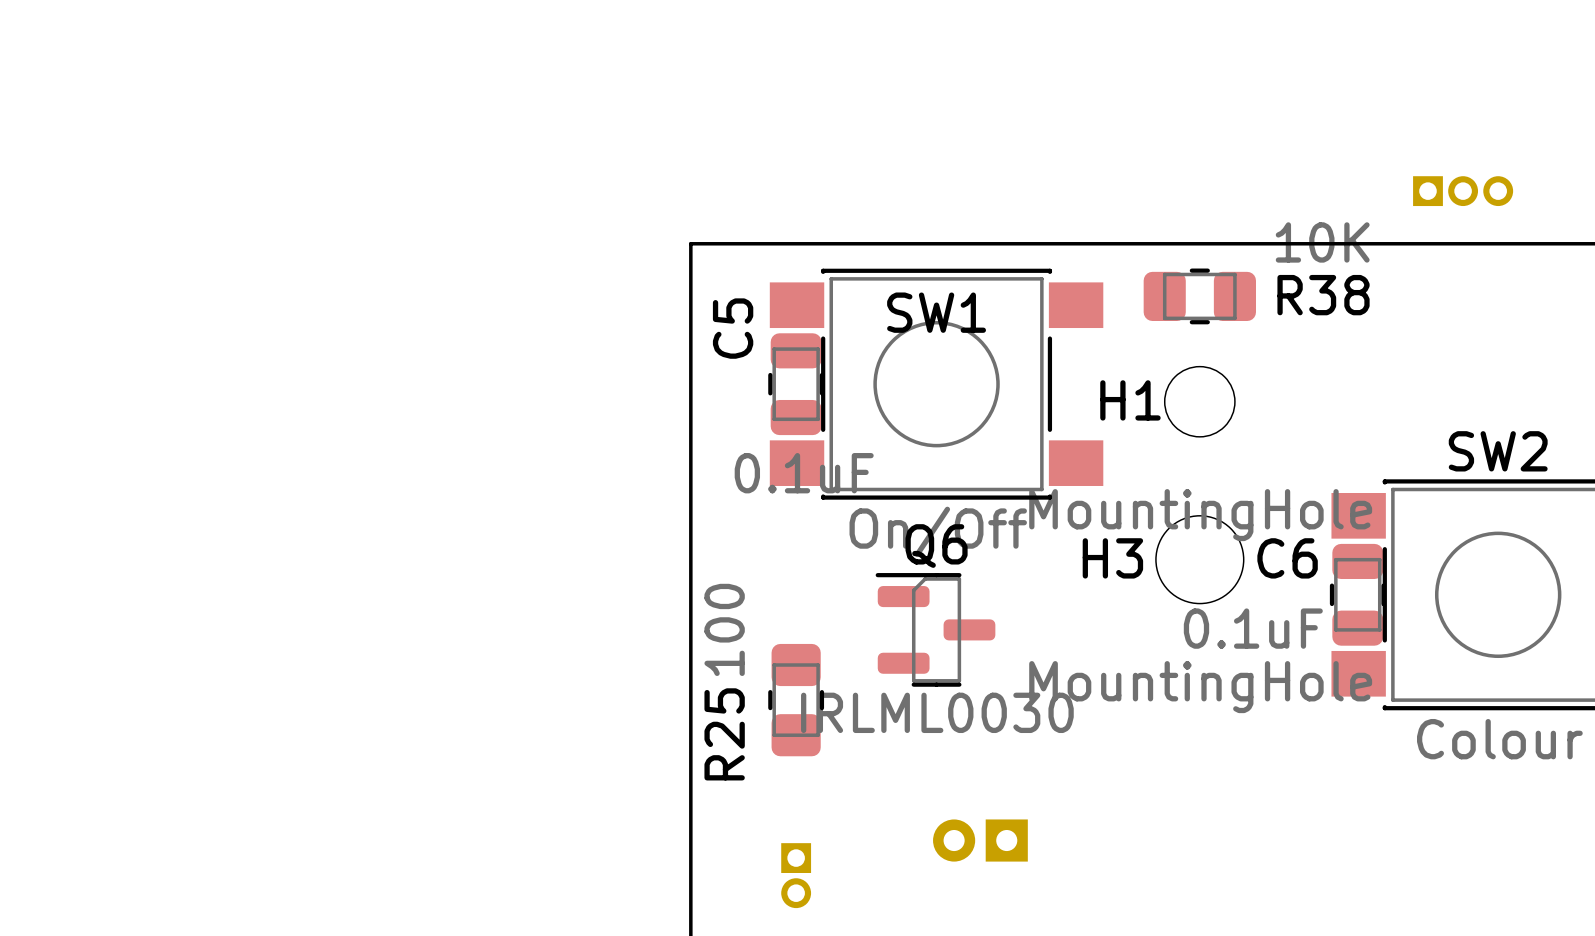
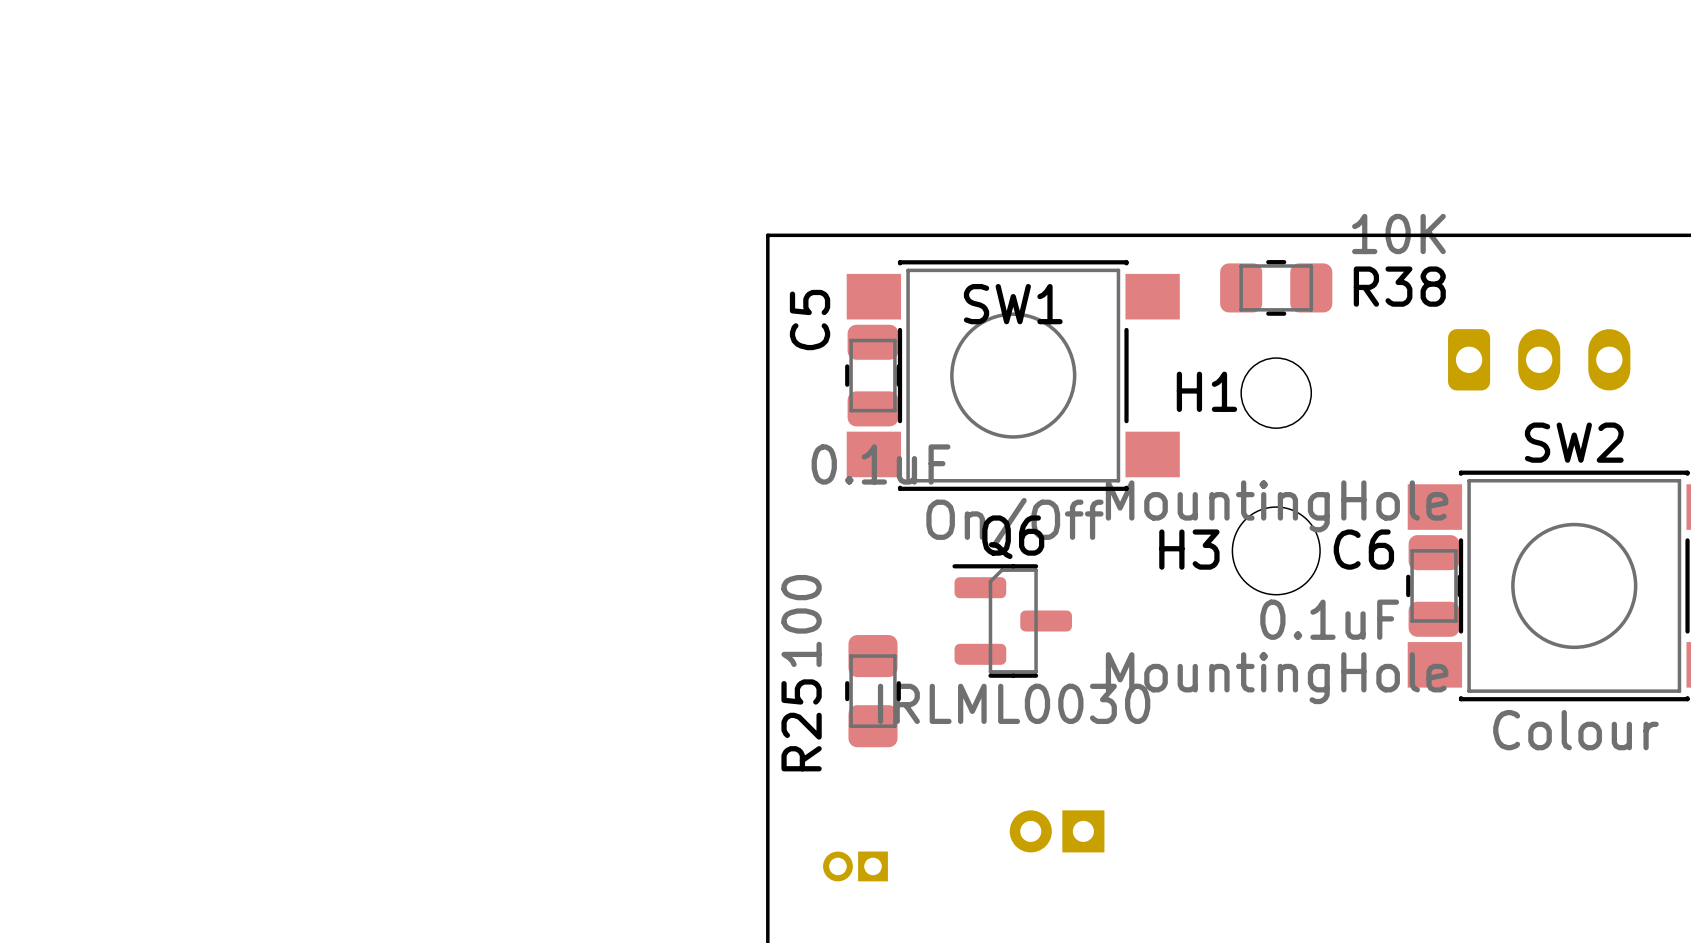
part: (1463, 191) -> none
part: none -> (1539, 359)
part rotation: 0° (796, 875) -> 90° clockwise (855, 866)

